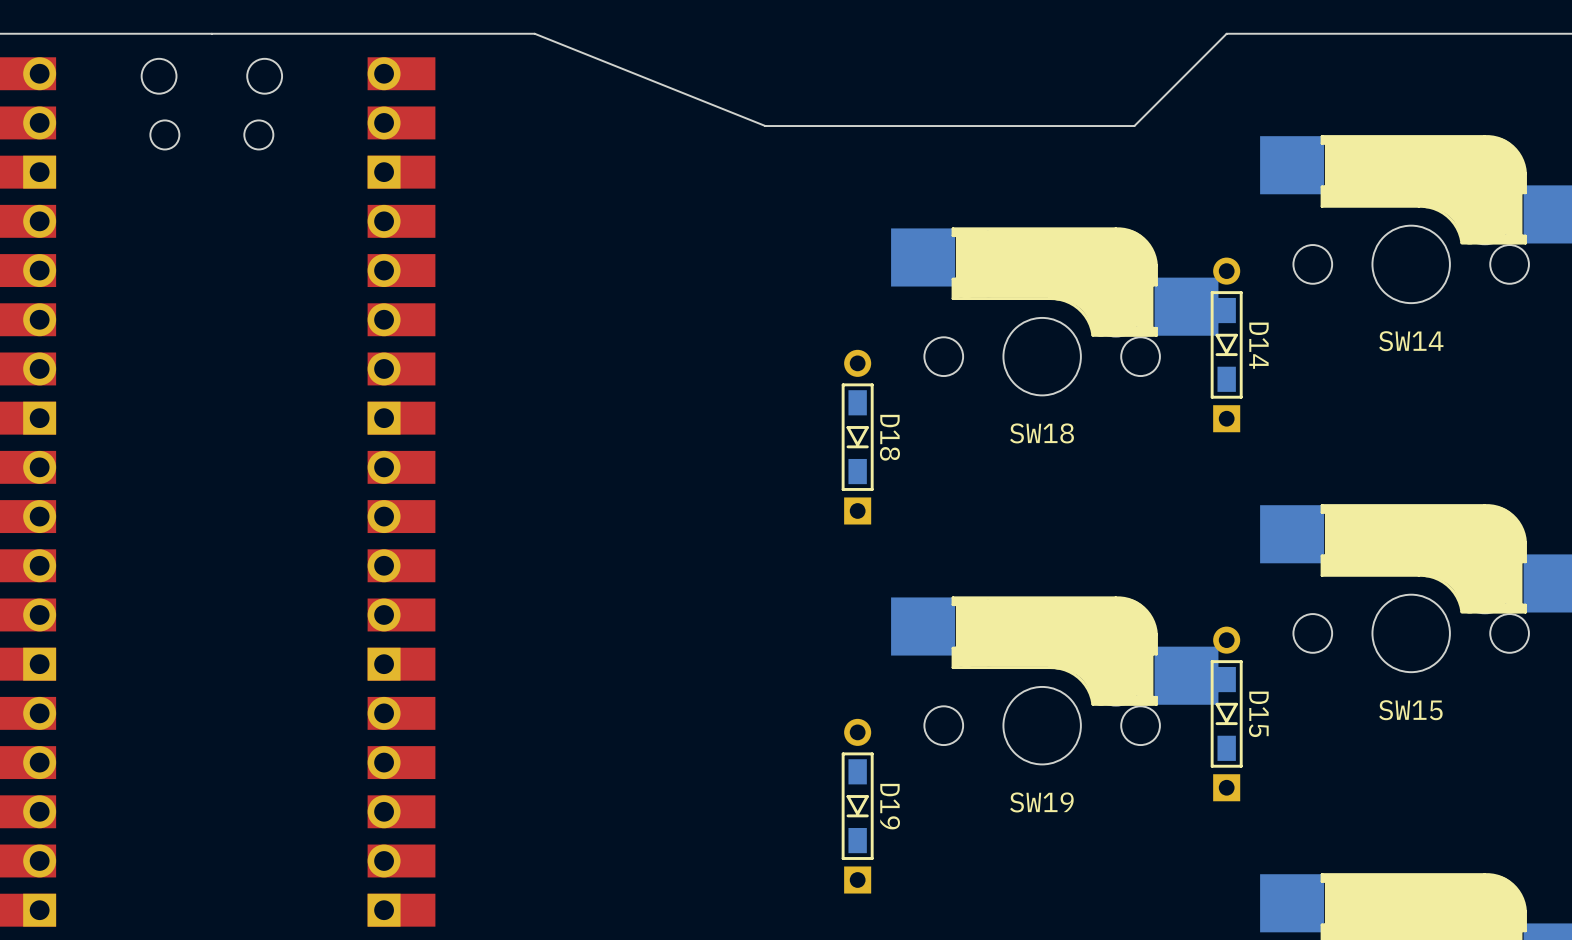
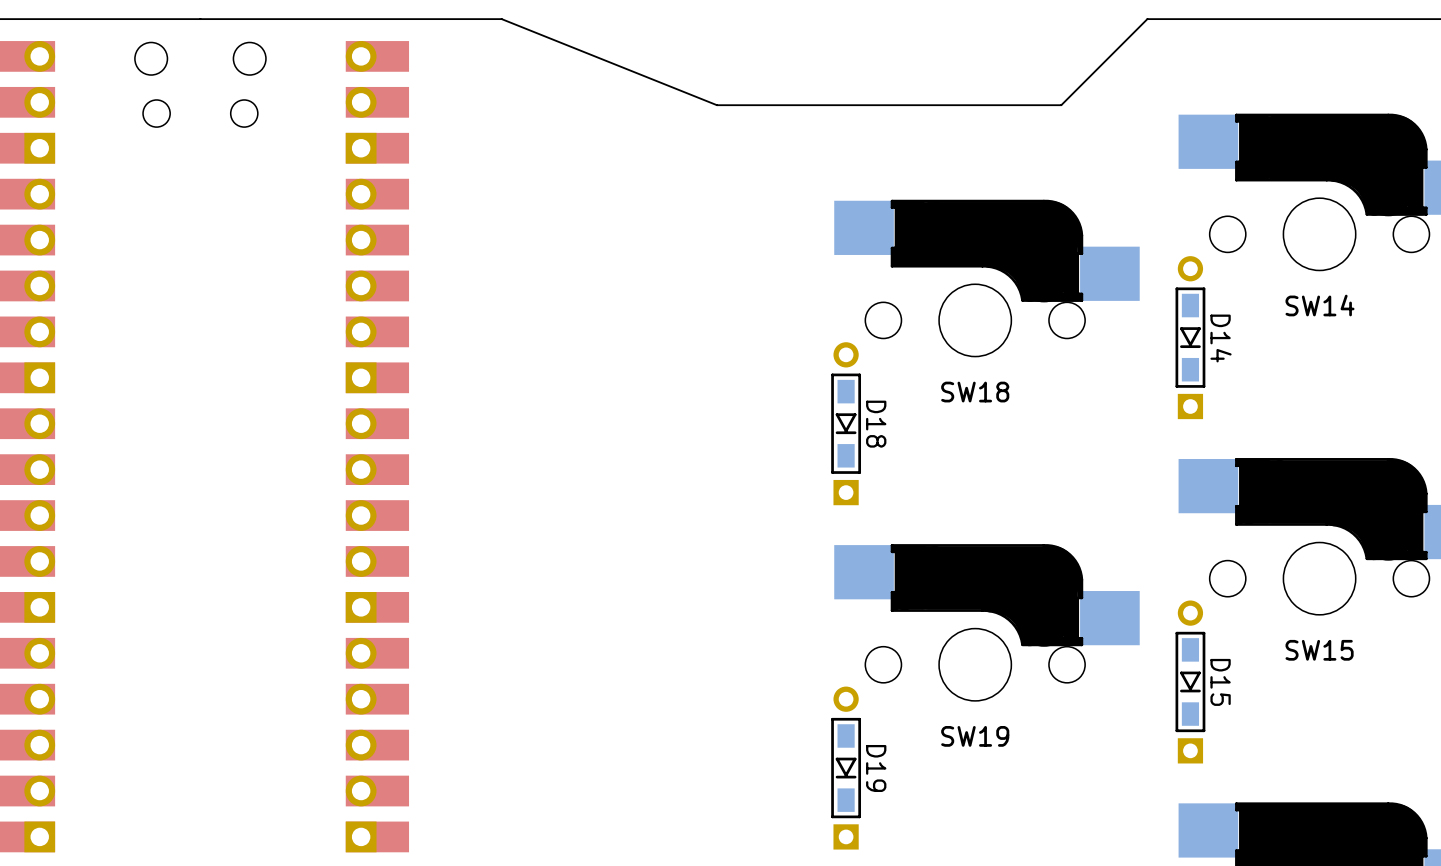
D14 position: (1226, 344) -> (1190, 337)
D18 position: (857, 437) -> (846, 423)
D15 position: (1226, 713) -> (1190, 681)
D19 position: (857, 806) -> (846, 768)

